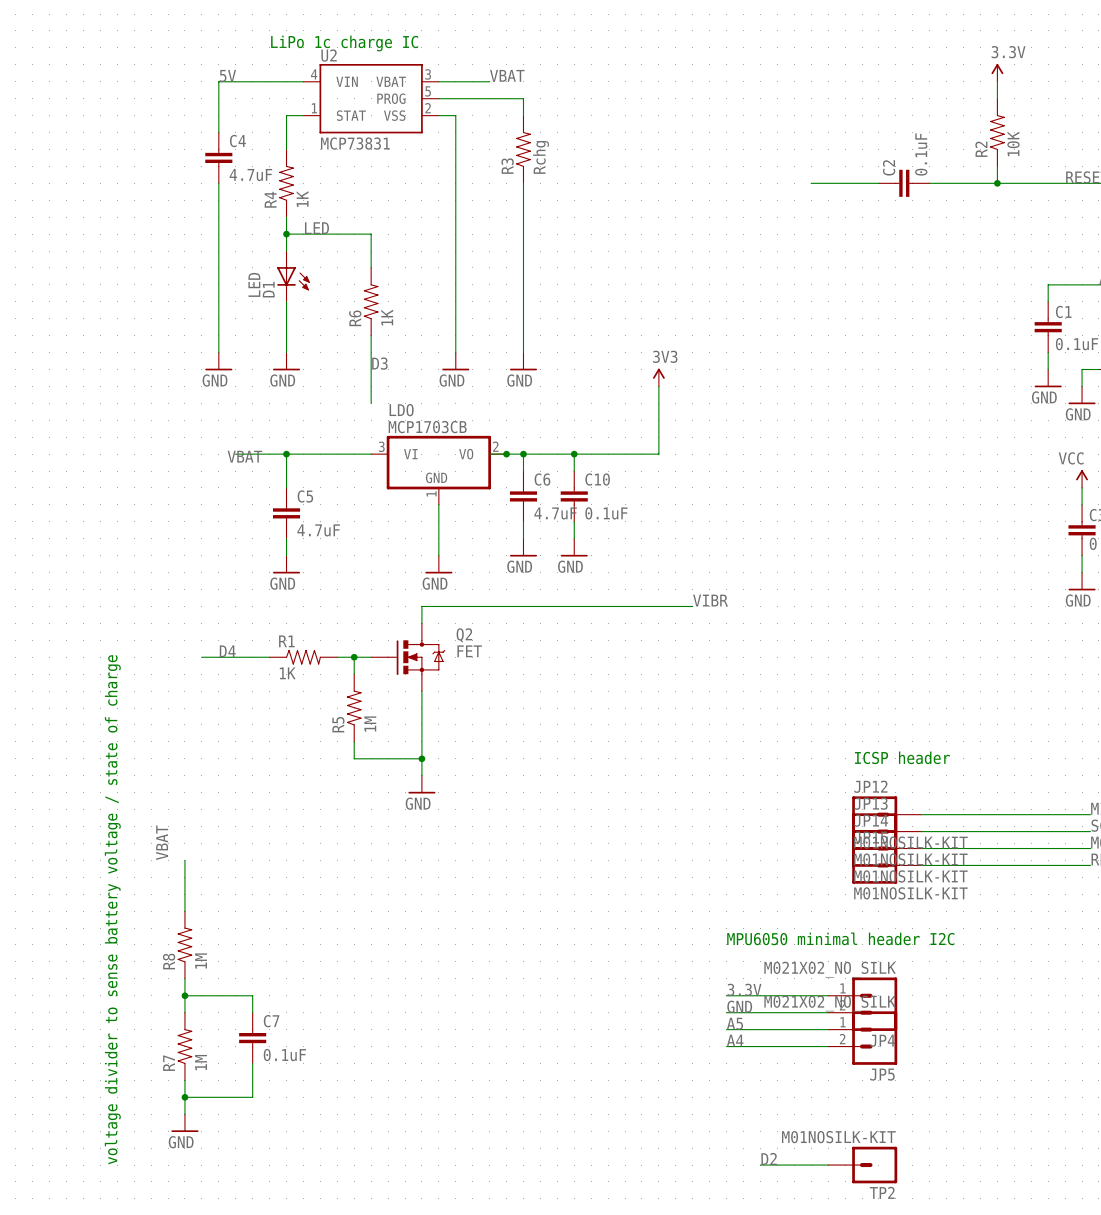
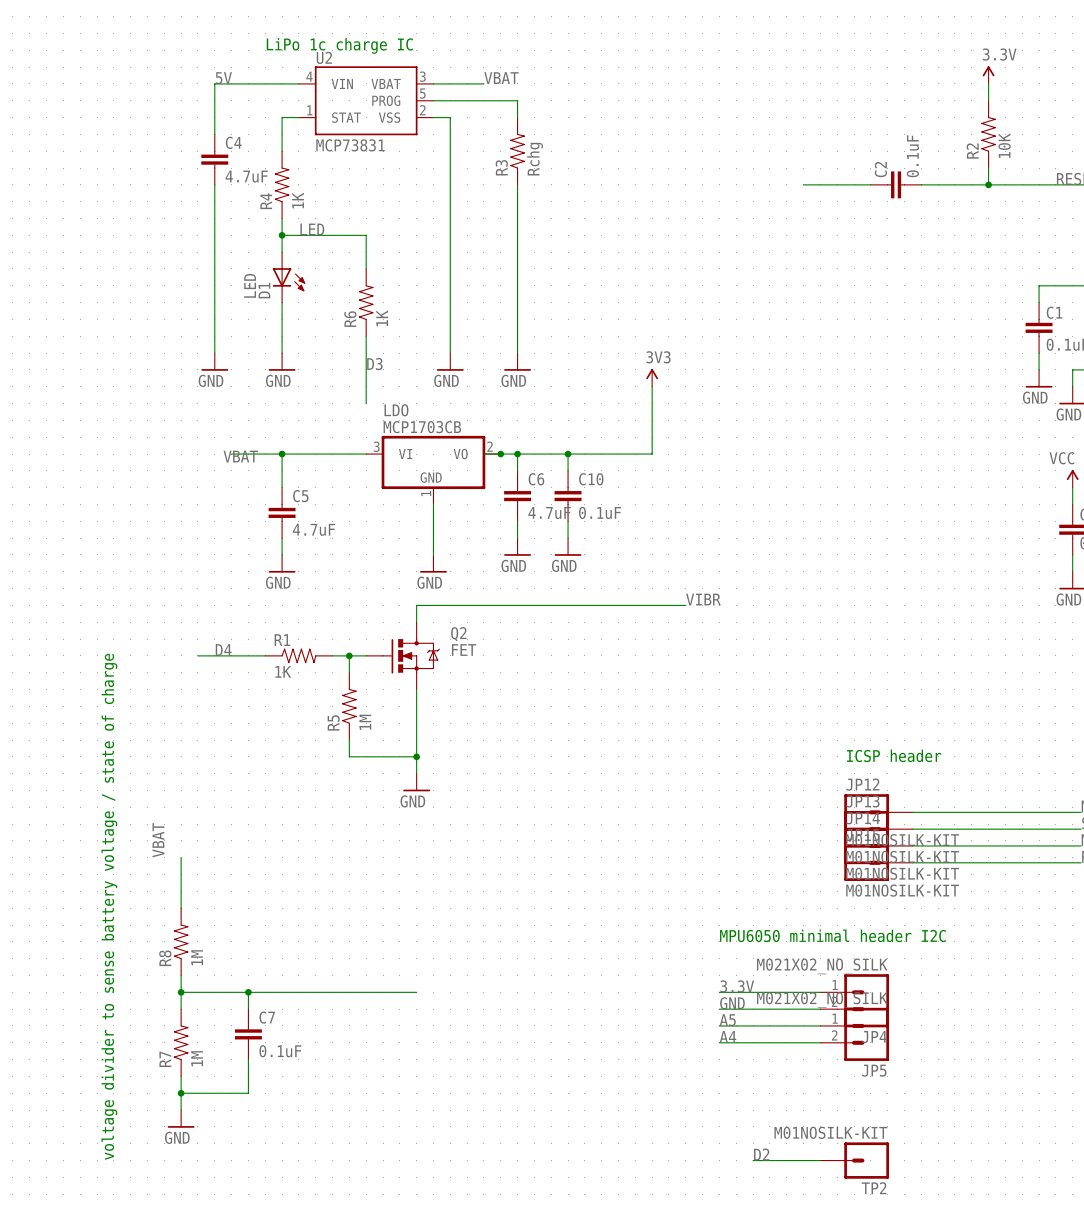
wire: none -> (248, 992) (416, 992)
junction: none -> (248, 992)

